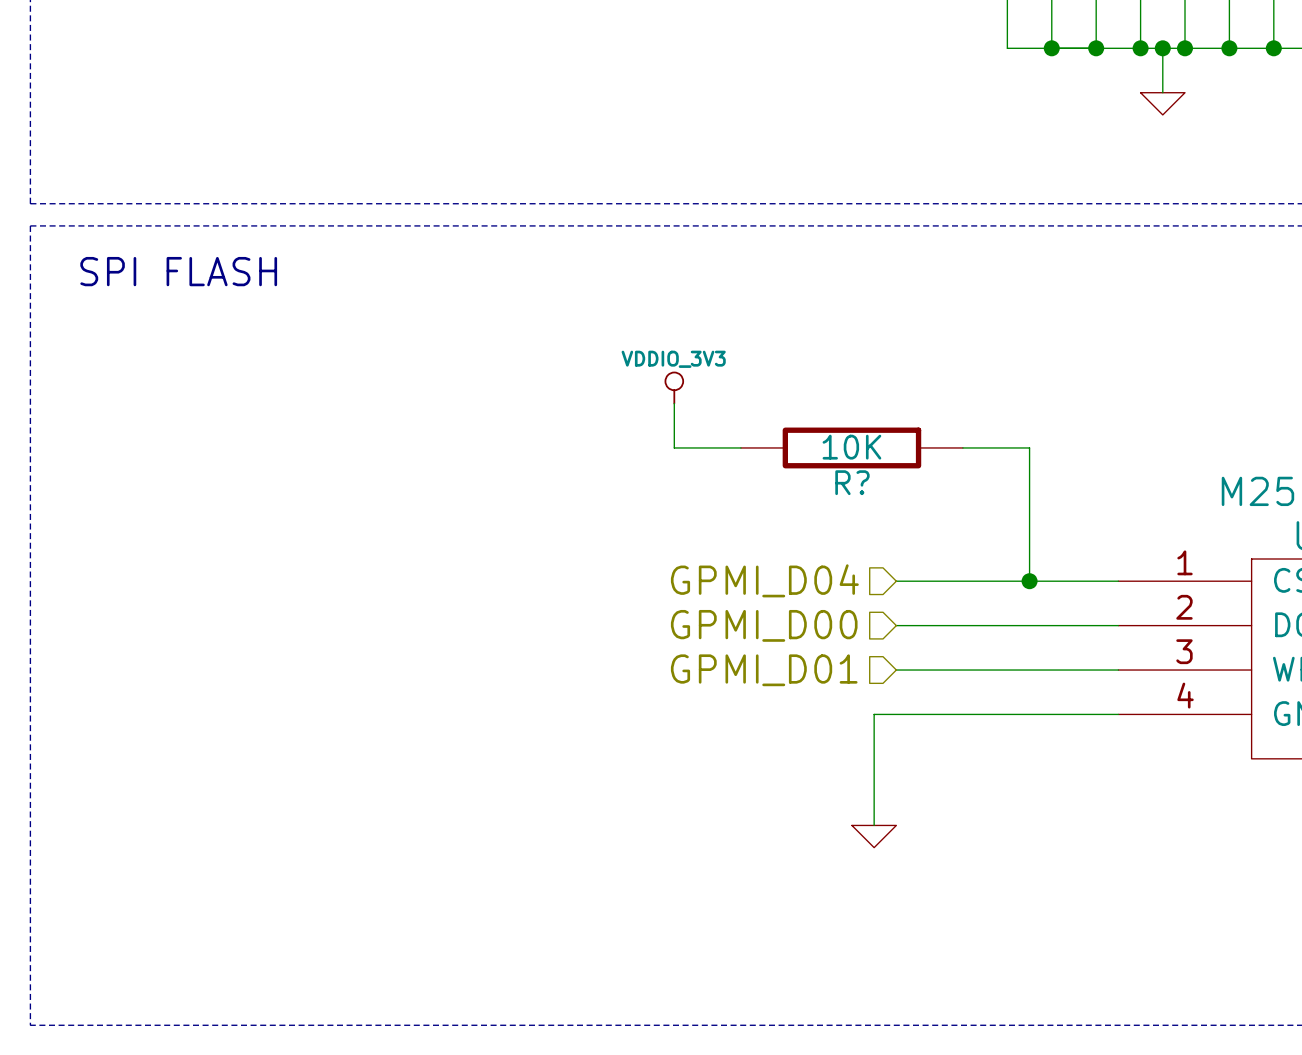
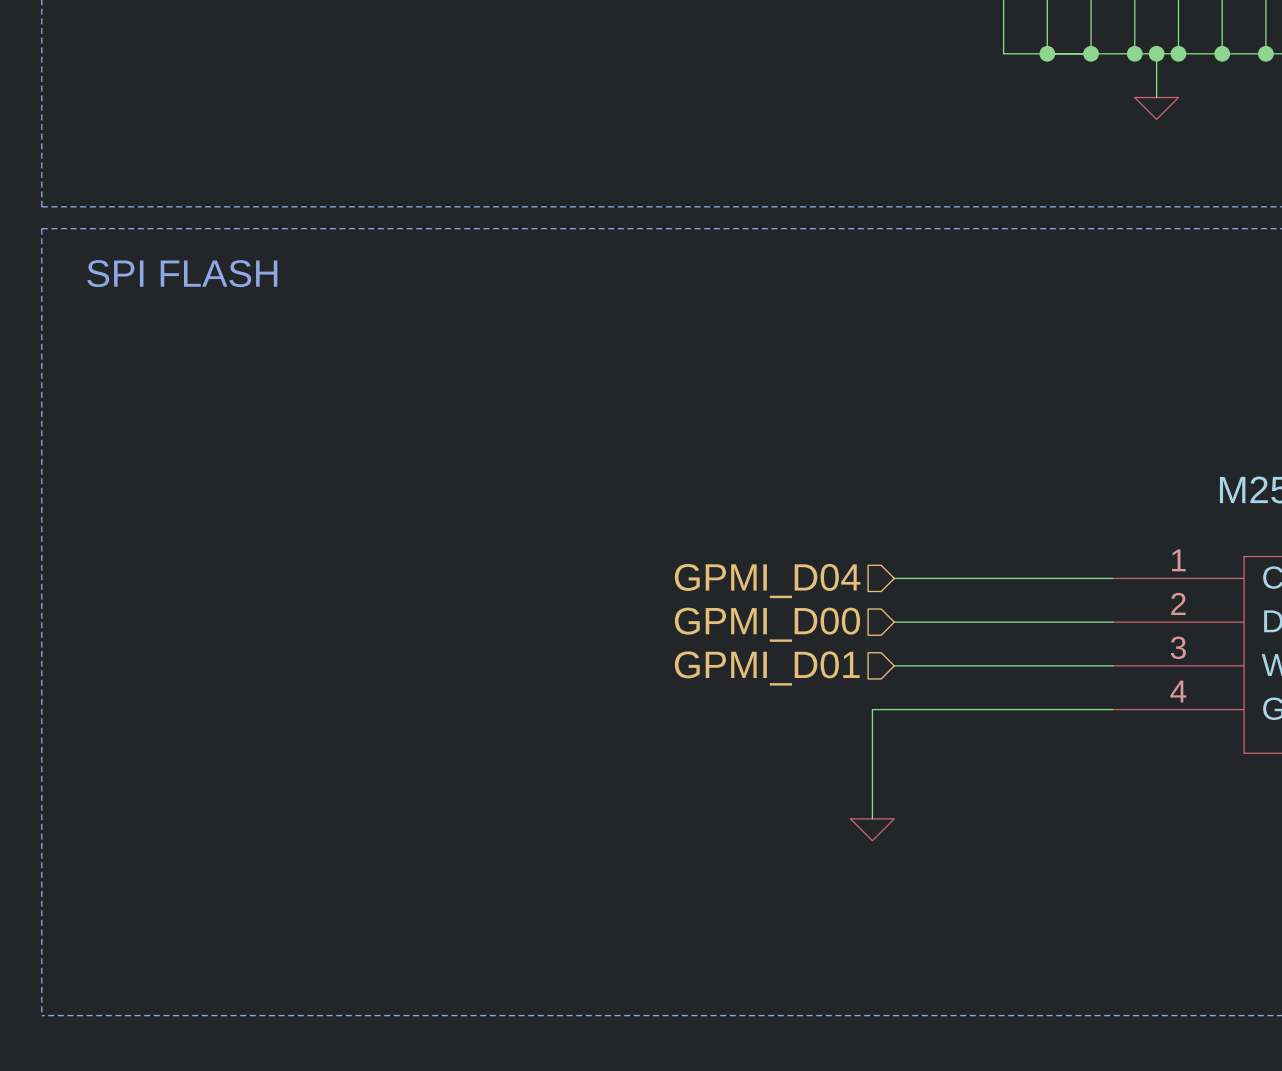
power symbol: VDDIO_3V3 (674, 388) -> none
wire: (674, 403) (674, 447) (740, 447) -> none
R?: 10K (851, 447) -> none
wire: (962, 447) (1029, 447) (1029, 581) -> none
junction: (1029, 581) -> none

